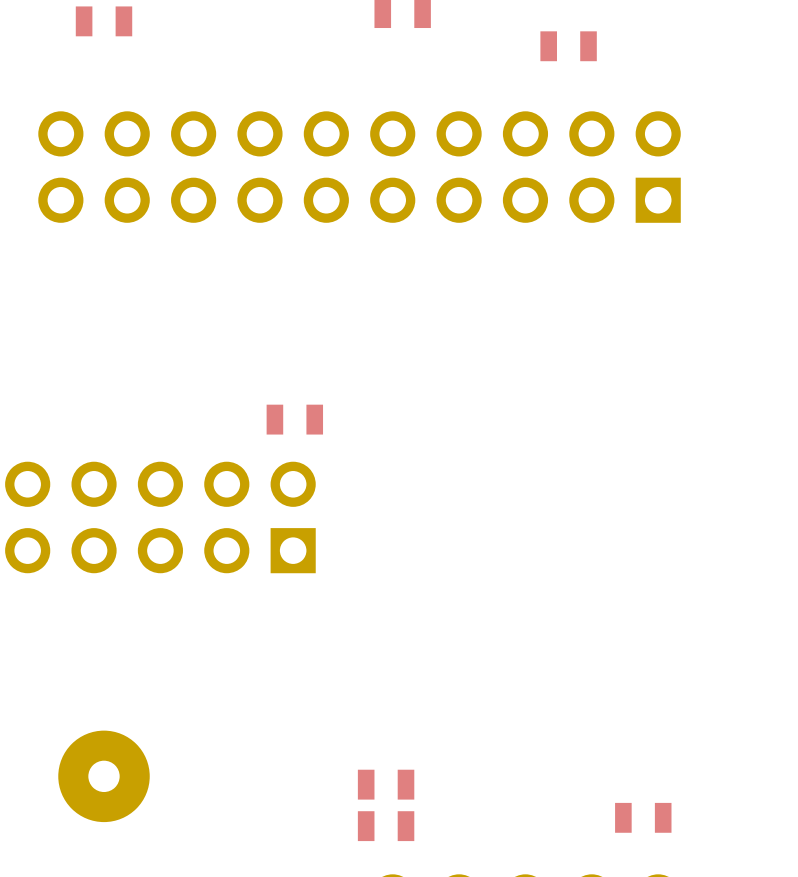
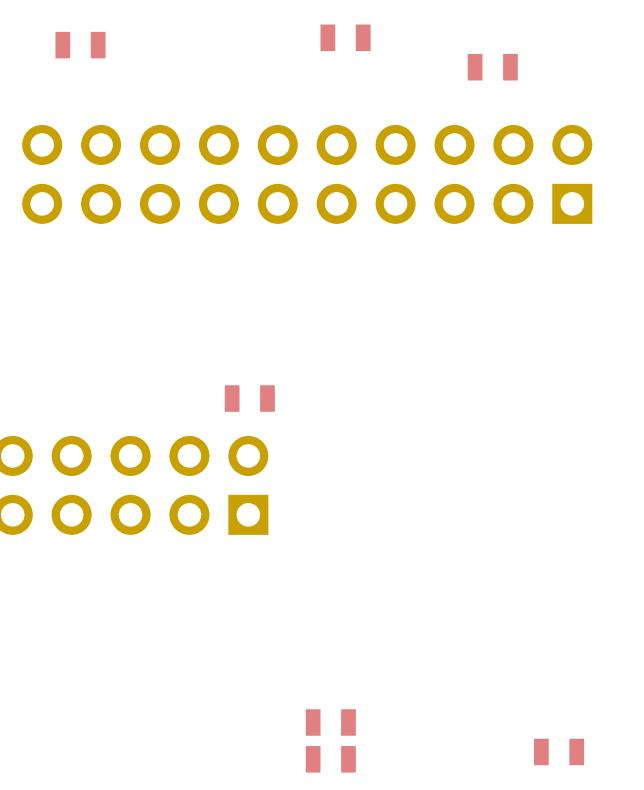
part: (104, 776) -> none

